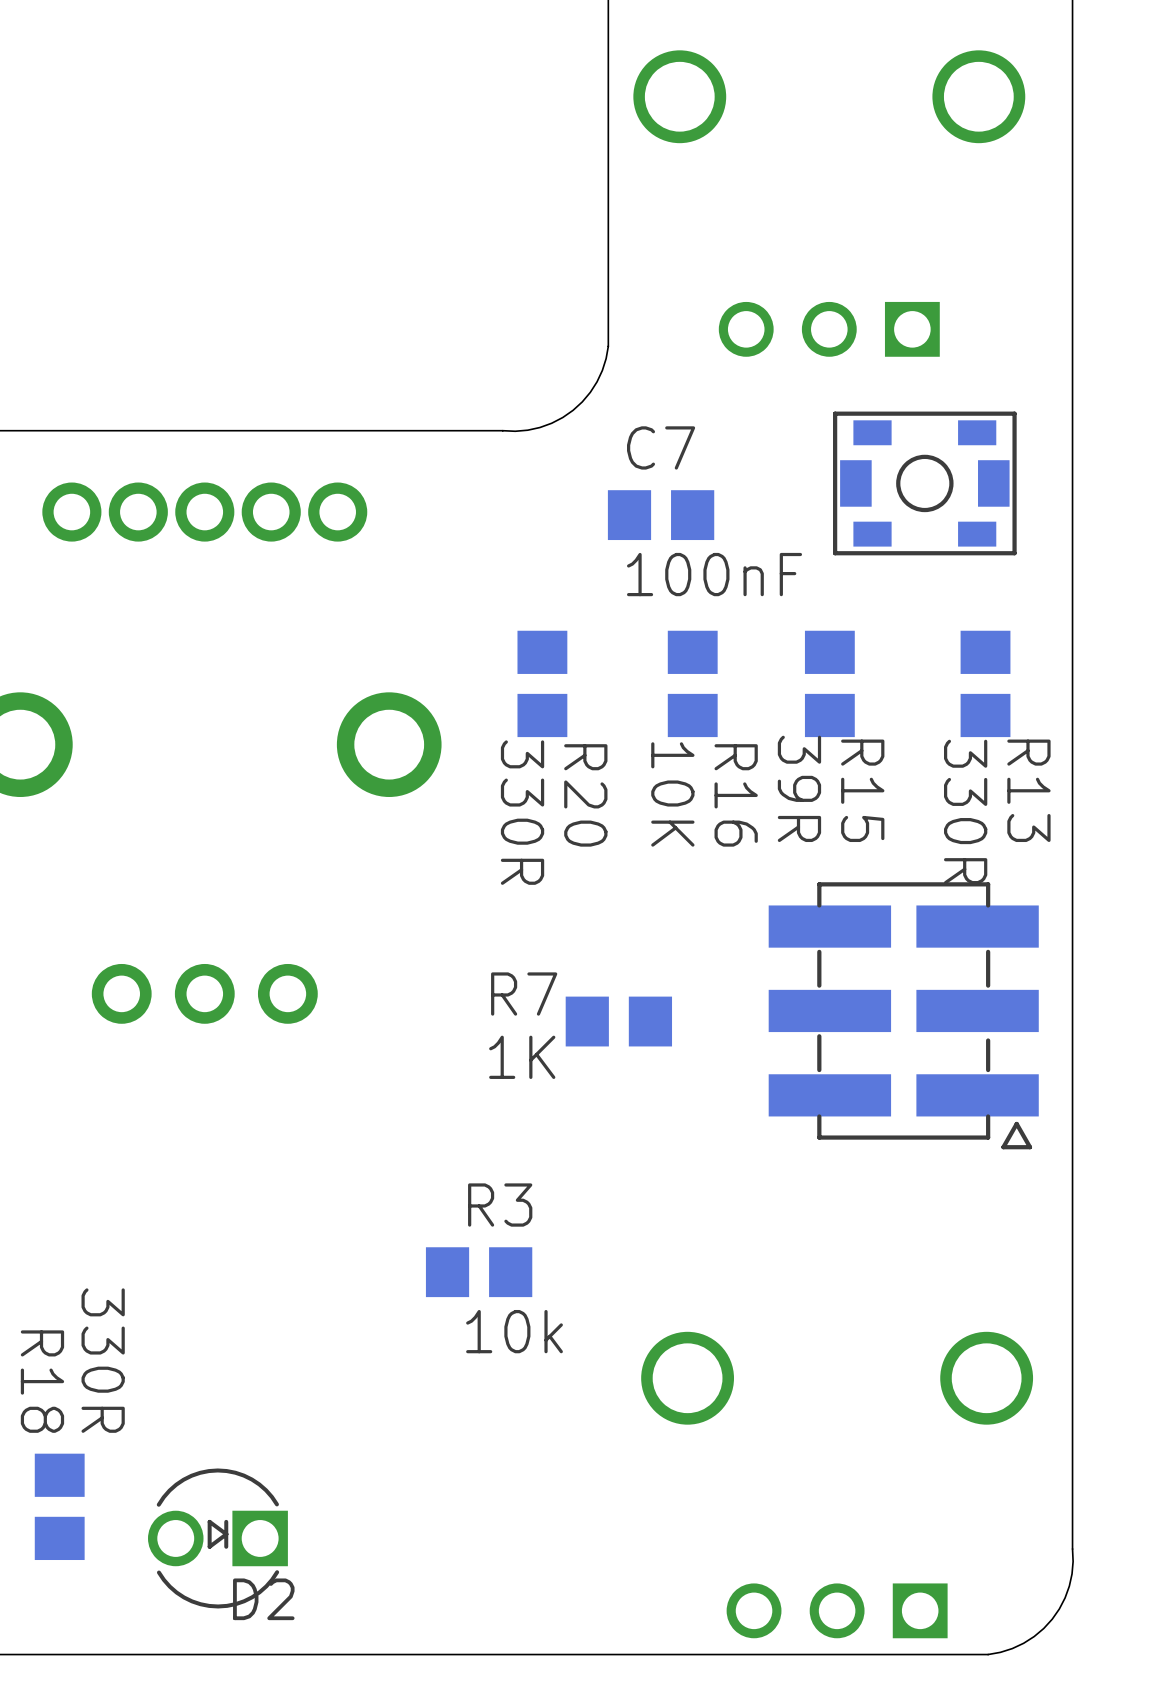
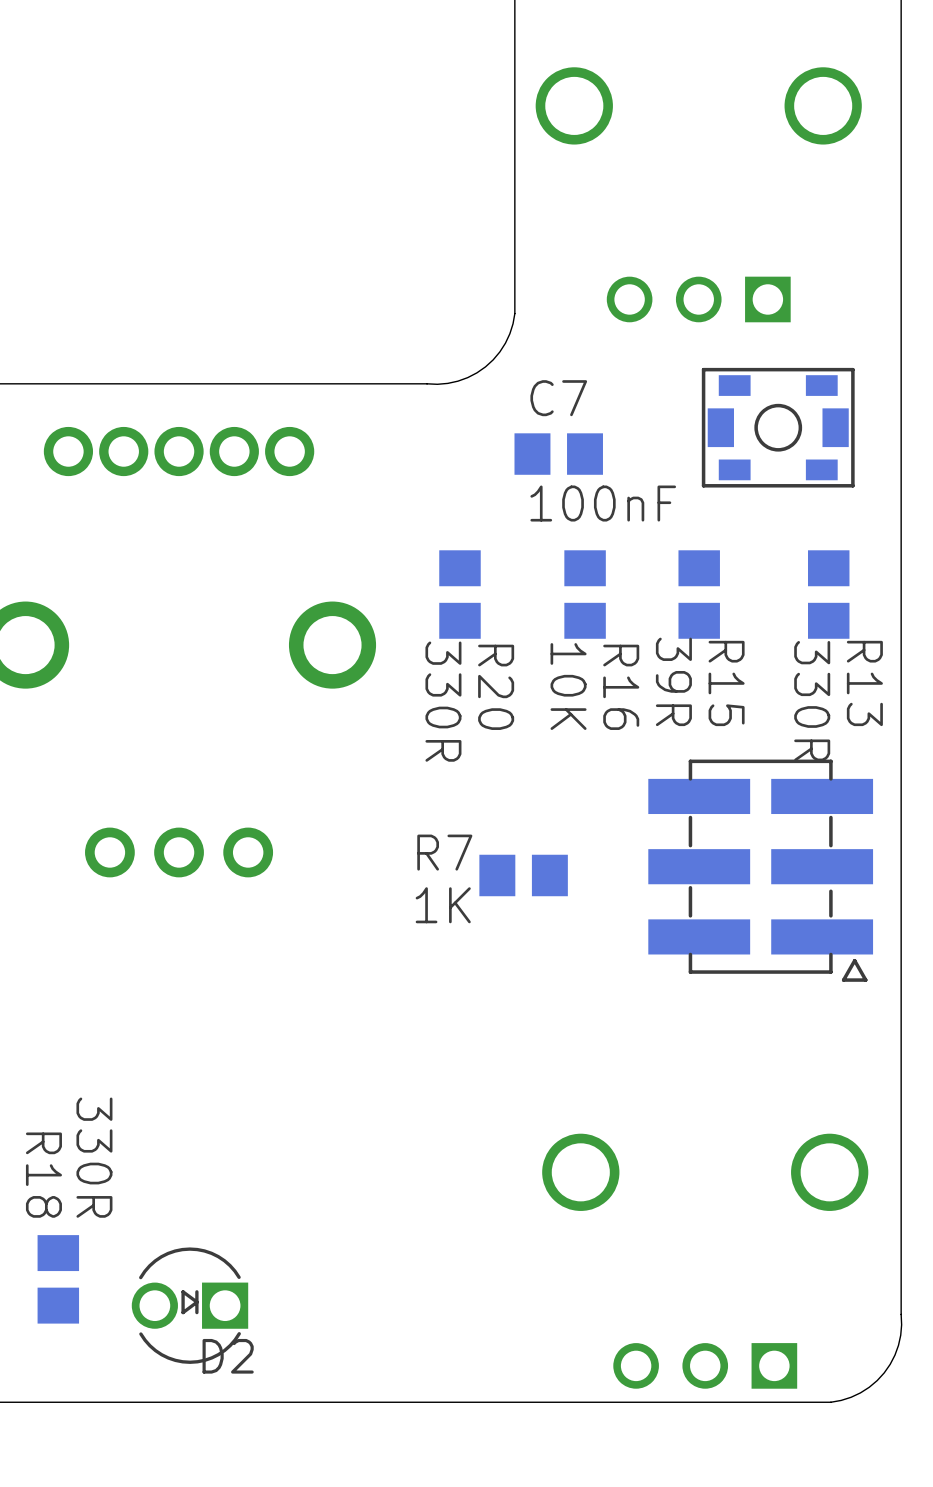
R3: 10k (479, 1272) -> none

